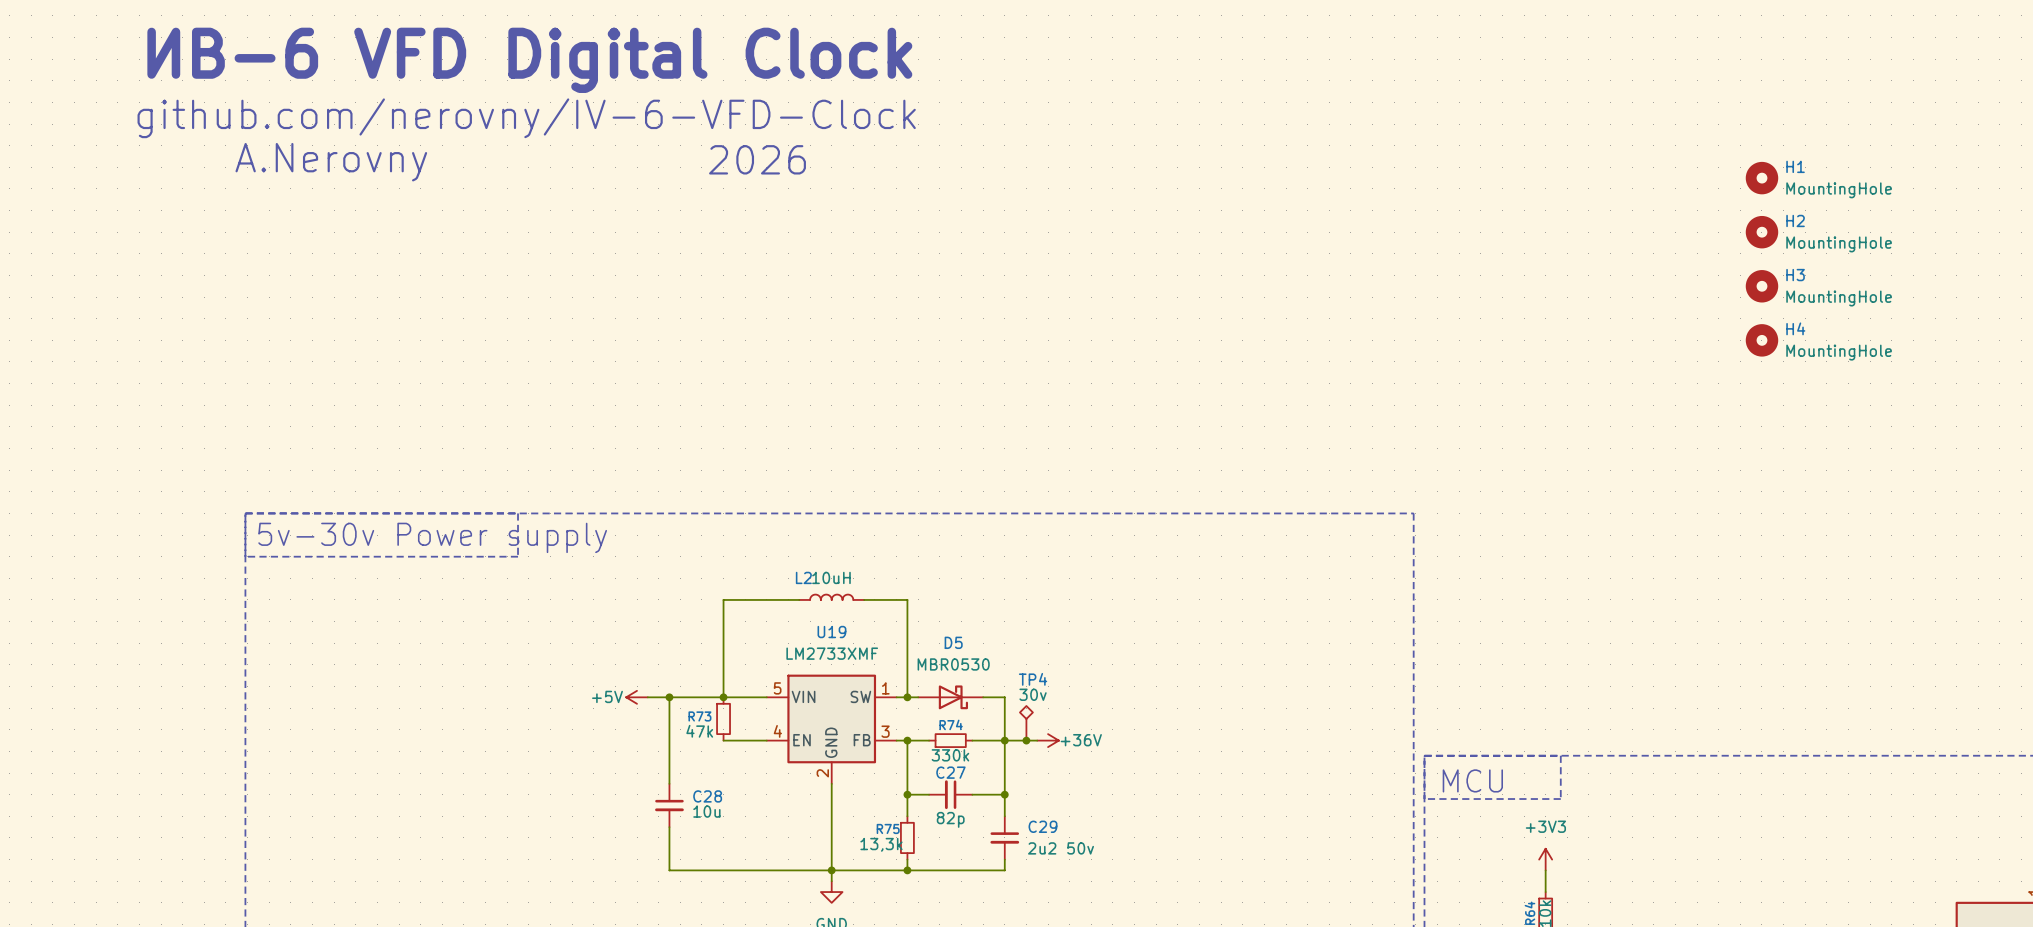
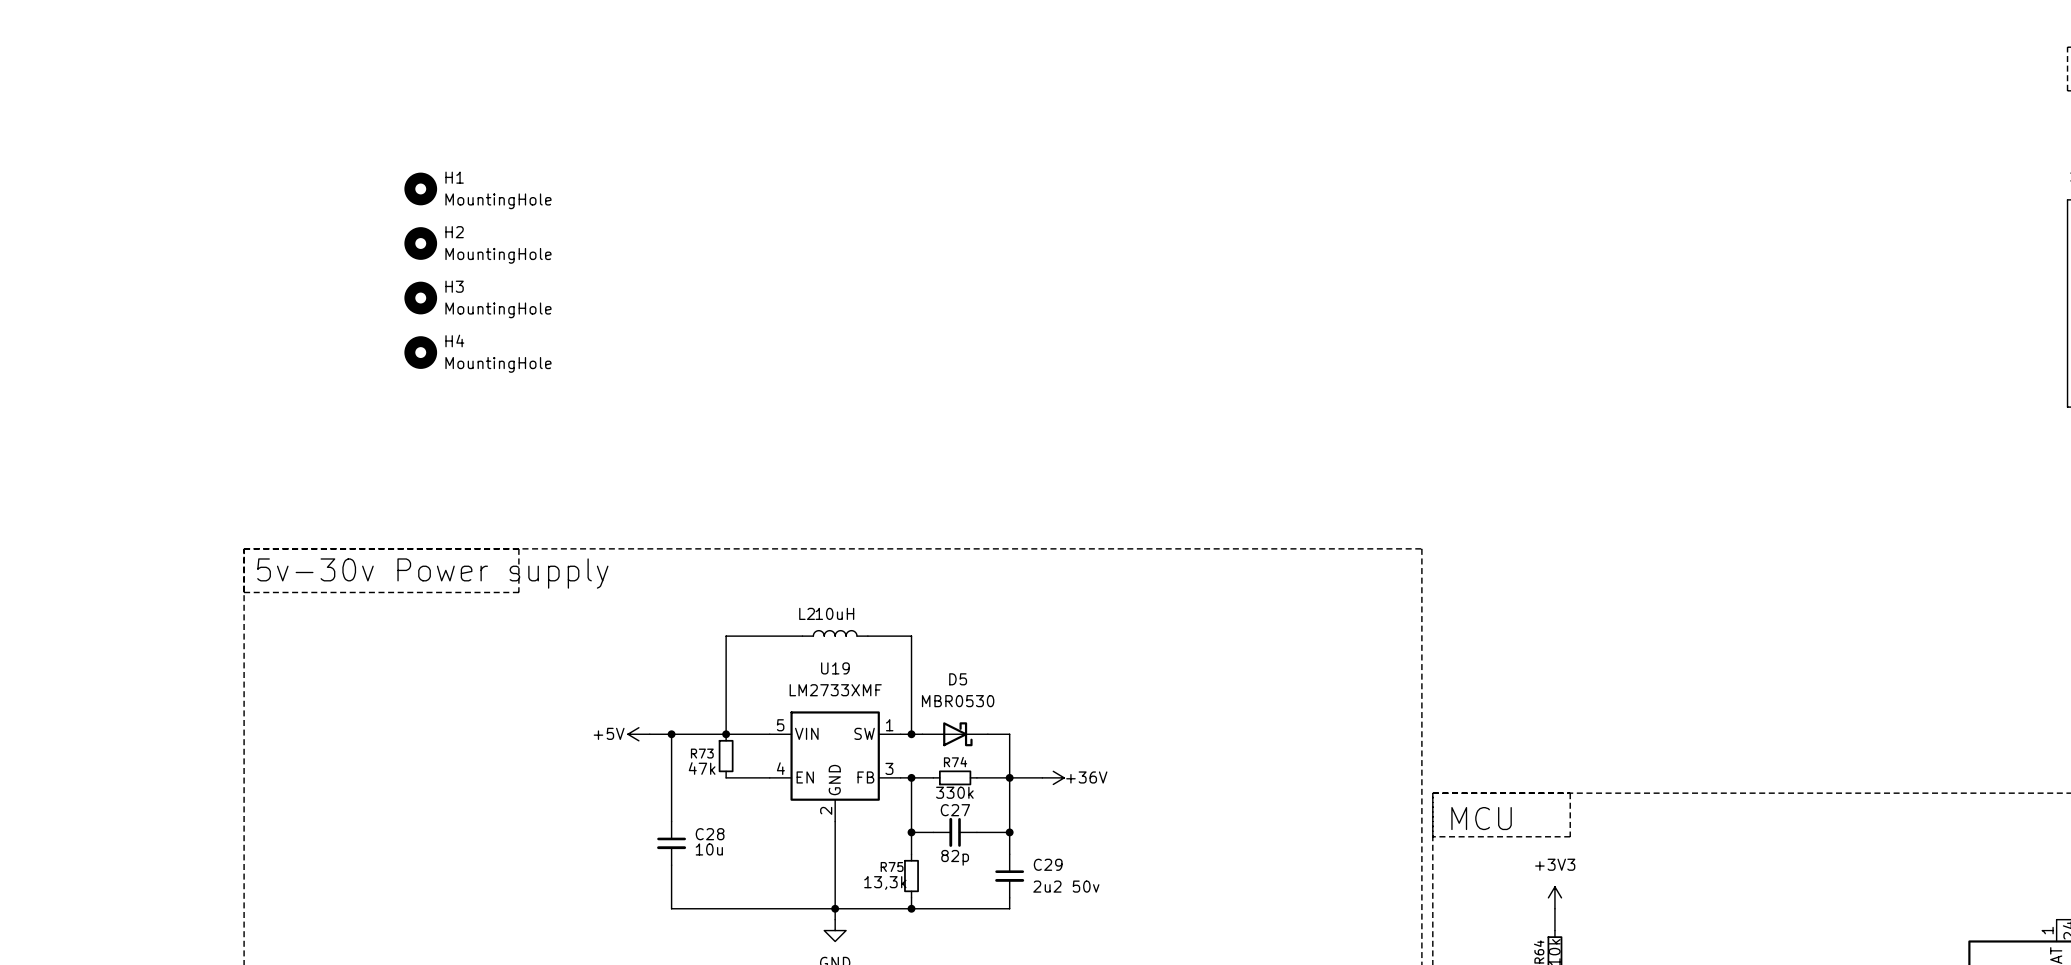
text: ИВ-6 VFD Digital Clock (529, 60) -> none
text: github.com/nerovny/IV-6-VFD-Clock (526, 118) -> none
text: 2026 (757, 159) -> none
text: A.Nerovny (331, 162) -> none
H1 position: (1761, 178) -> (420, 188)
H2 position: (1761, 232) -> (420, 243)
H3 position: (1761, 286) -> (420, 298)
H4 position: (1761, 340) -> (420, 352)
TP4: 30v (1026, 723) -> none
junction: (1026, 740) -> none

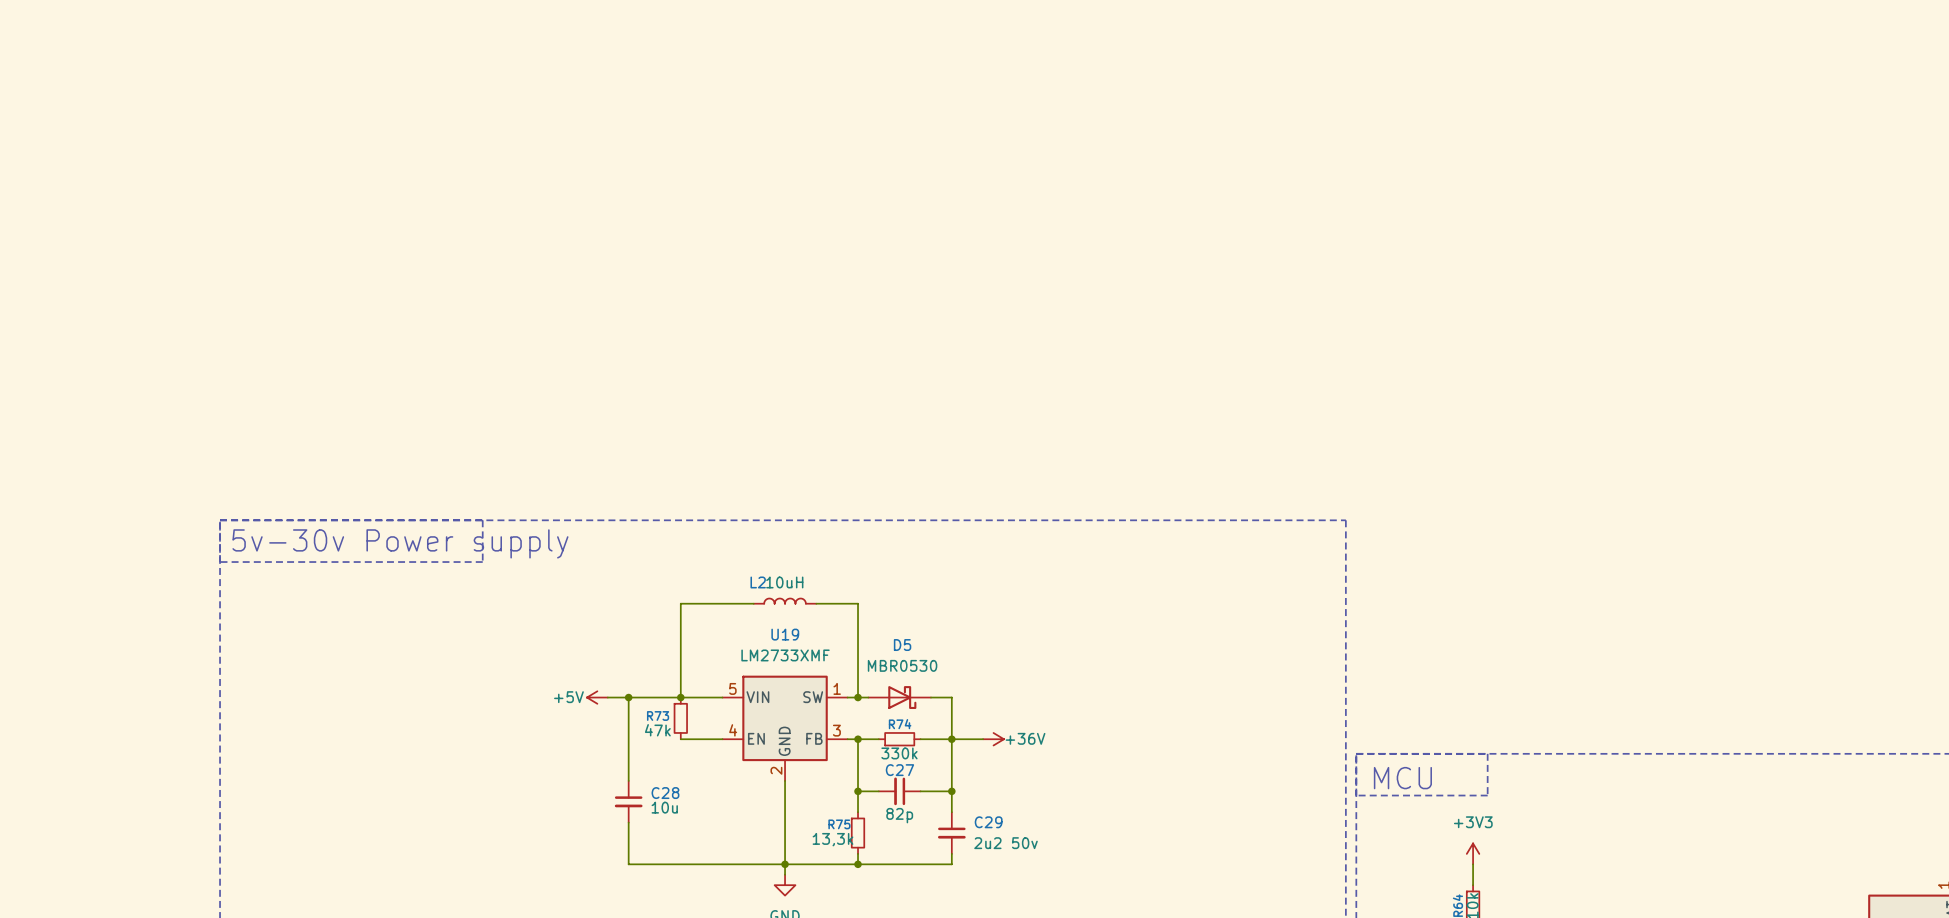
H1: MountingHole (420, 188) -> none
H2: MountingHole (420, 243) -> none
H3: MountingHole (420, 298) -> none
H4: MountingHole (420, 352) -> none

